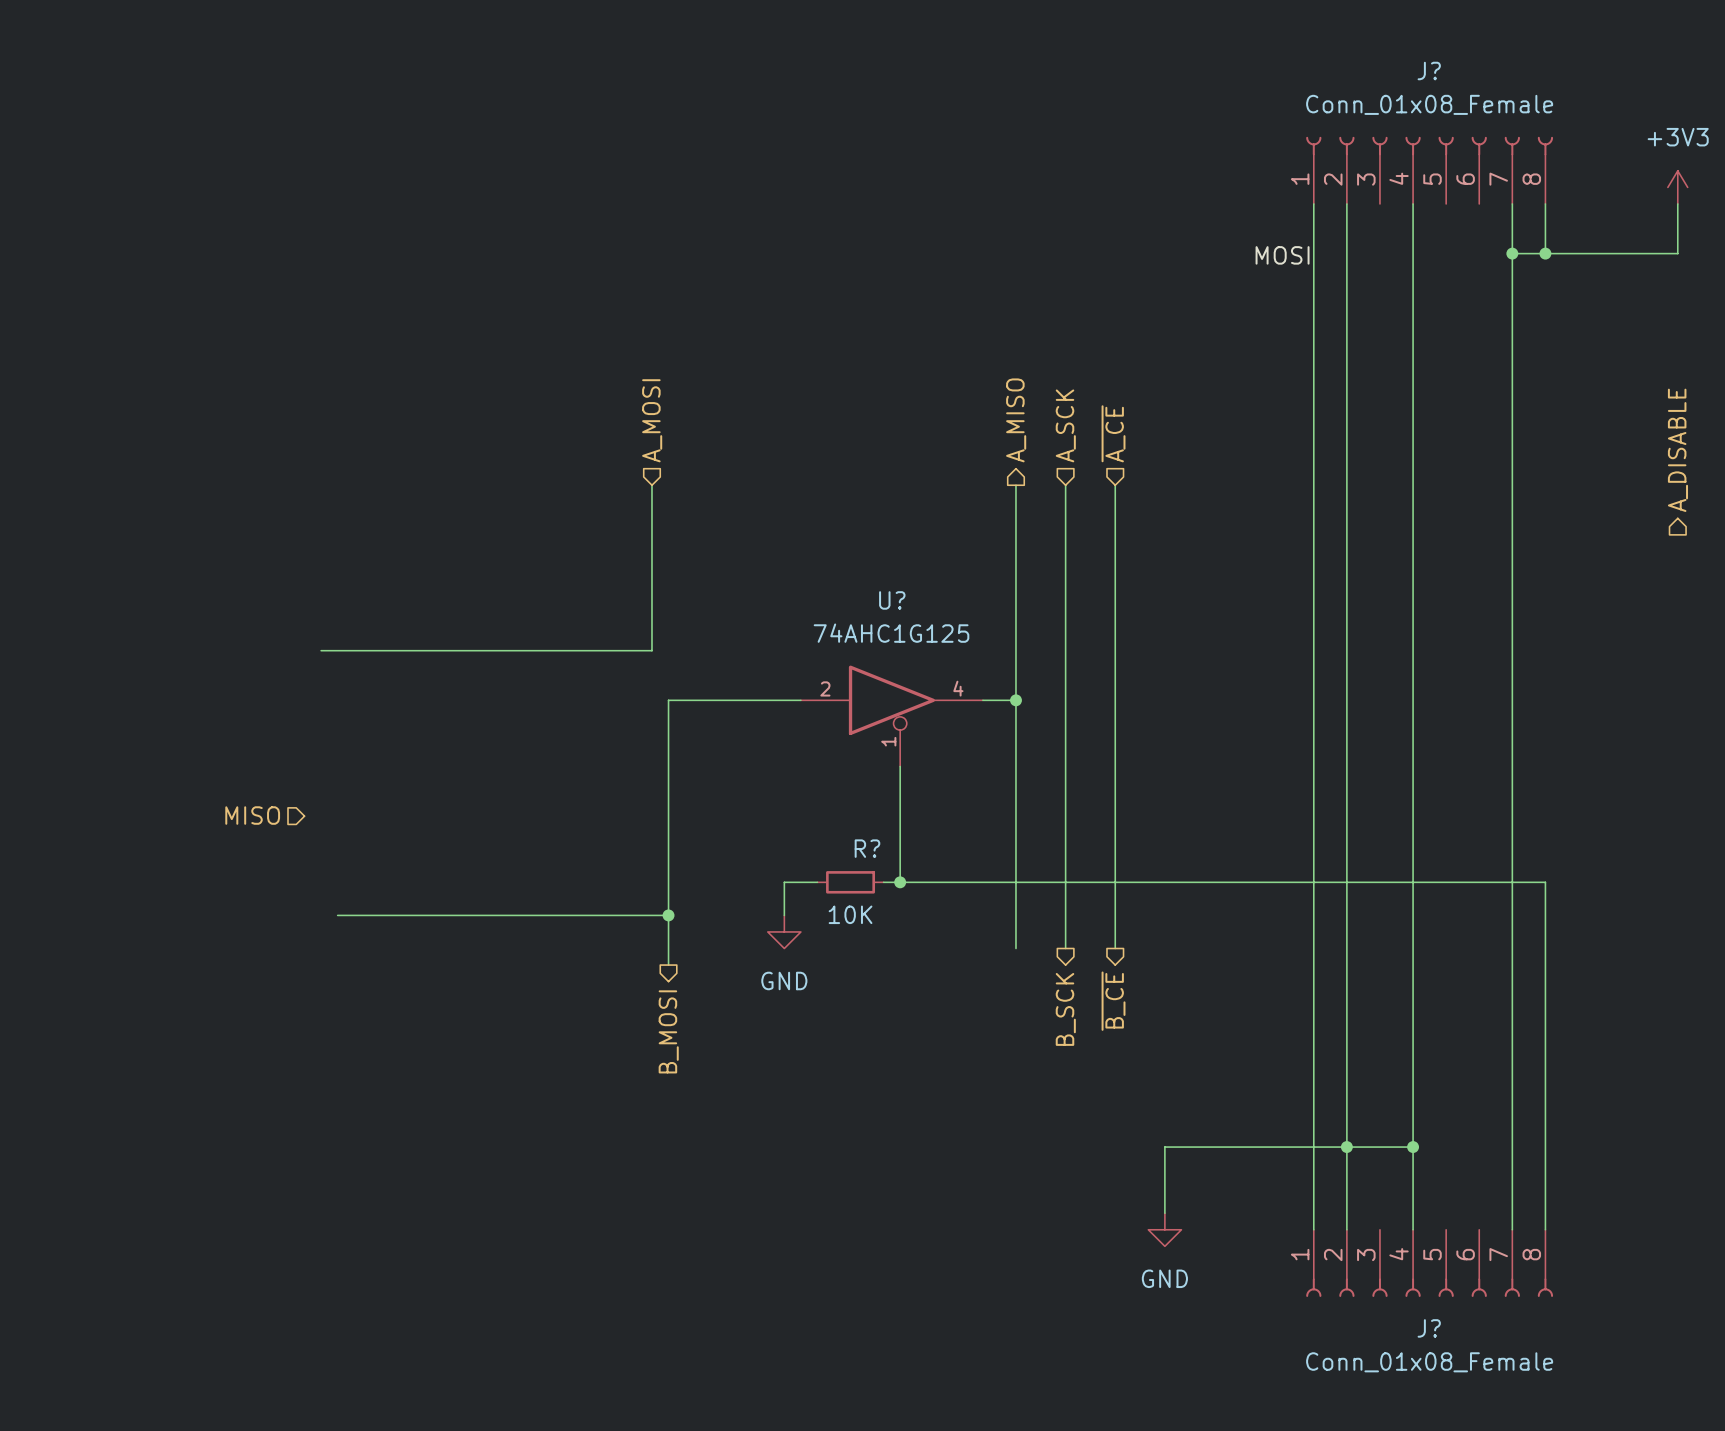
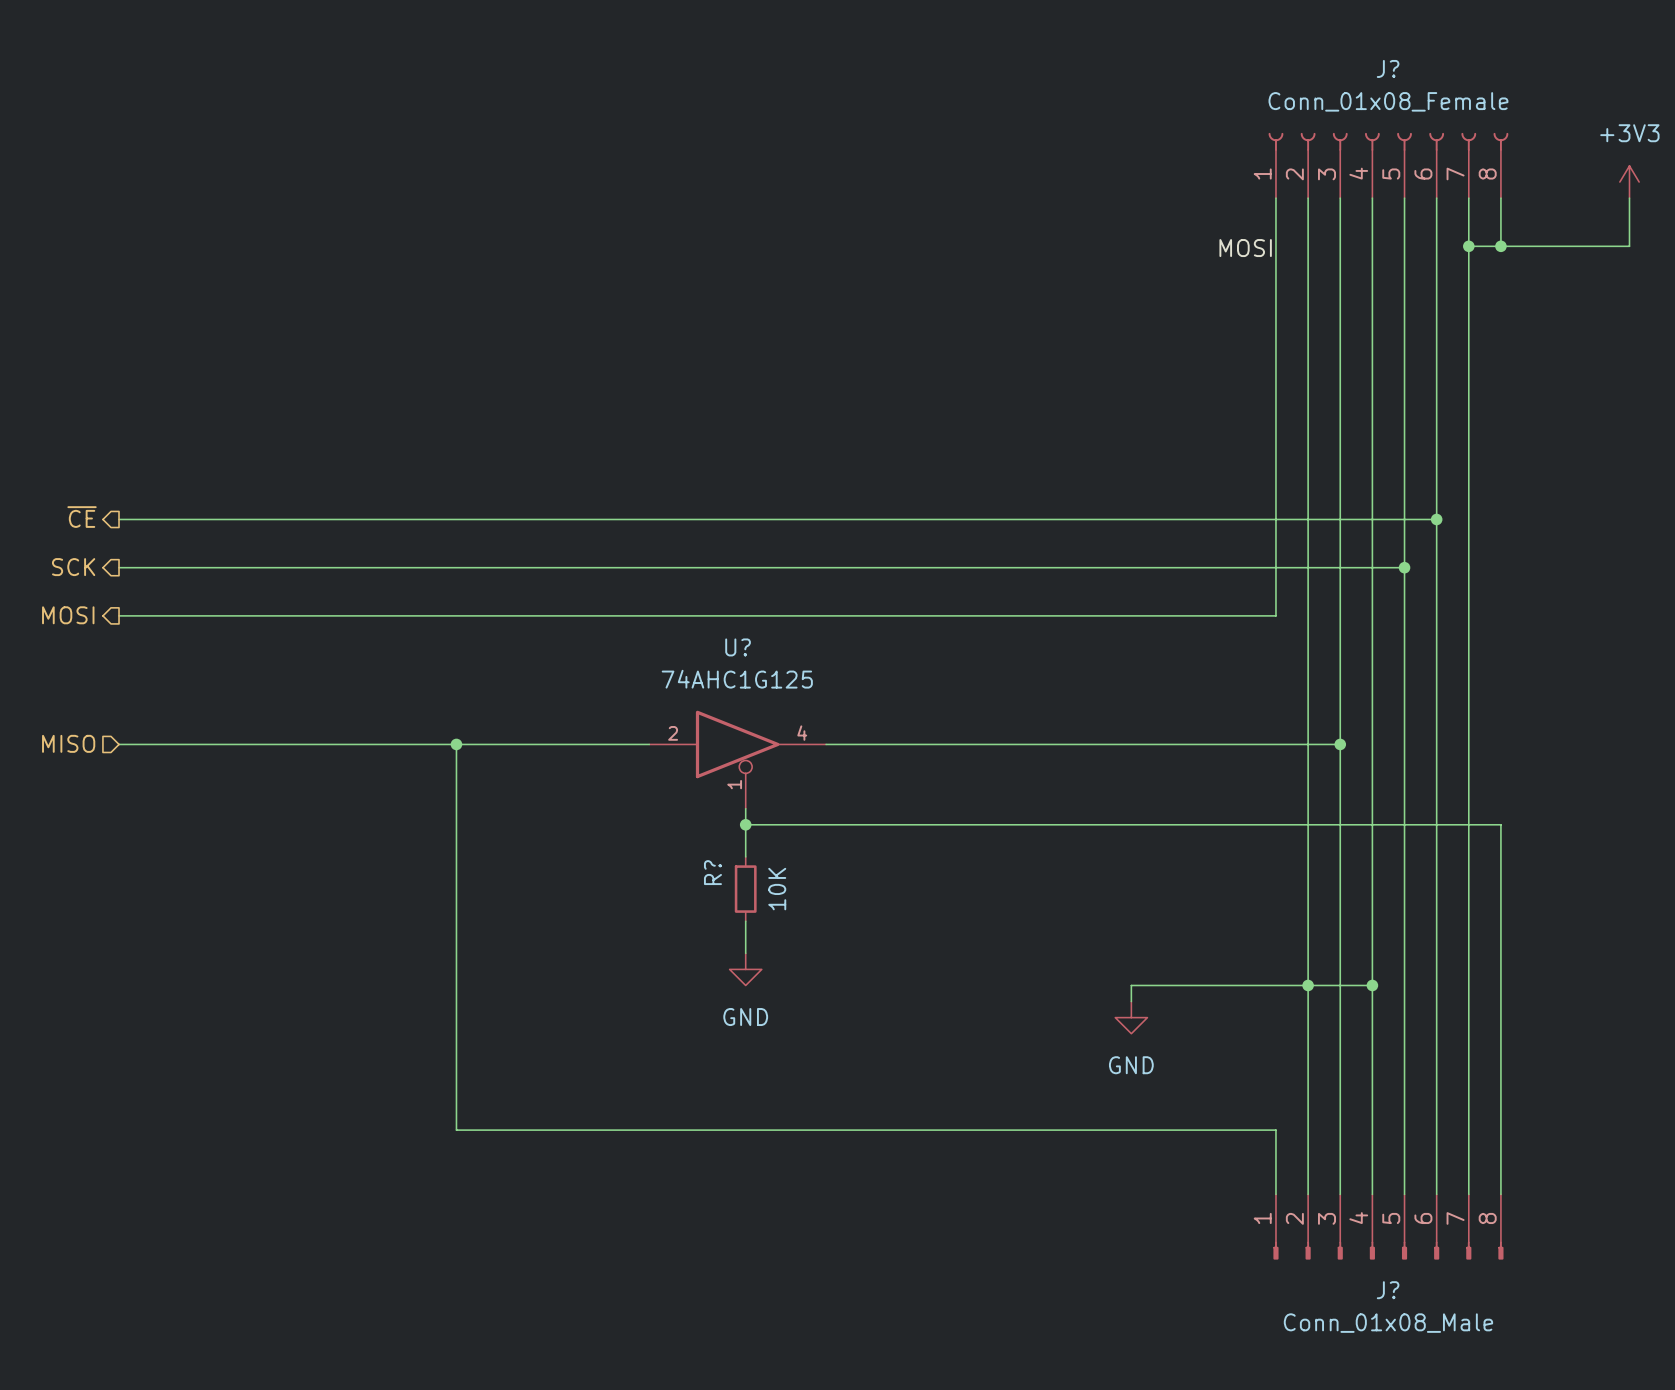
wire: none -> (1340, 198) (1340, 1194)
wire: none -> (1404, 198) (1404, 1194)
wire: none -> (1436, 198) (1436, 1194)
hierarchical label: A_MOSI (652, 420) -> none
hierarchical label: A_MISO (1016, 420) -> none
hierarchical label: A_SCK (1065, 425) -> none
hierarchical label: ~{A_CE} (1113, 433) -> none
hierarchical label: A_DISABLE (1677, 450) -> none
wire: (651, 485) (651, 650) (321, 650) -> none
wire: (1015, 485) (1015, 948) -> none
wire: (1065, 485) (1065, 948) -> none
wire: (1115, 485) (1115, 948) -> none
hierarchical label: none -> ~{CE} (82, 517)
wire: none -> (119, 519) (1436, 519)
junction: none -> (1436, 519)
hierarchical label: none -> SCK (73, 567)
wire: none -> (119, 567) (1404, 567)
junction: none -> (1404, 567)
hierarchical label: none -> MOSI (68, 615)
wire: none -> (119, 615) (1275, 615)
wire: (1313, 634) (1313, 1163) -> (456, 744) (456, 1130) (1275, 1130)
wire: (800, 700) (668, 700) (668, 965) -> none
wire: (982, 700) (1015, 700) -> none
junction: (1015, 700) -> none
U? position: (891, 716) -> (737, 759)
wire: none -> (119, 744) (649, 744)
junction: none -> (456, 744)
wire: none -> (826, 744) (1340, 744)
wire: (900, 766) (900, 882) -> none
junction: none -> (1340, 744)
hierarchical label position: MISO (252, 815) -> MISO (68, 743)
wire: none -> (745, 808) (745, 856)
R? name position: R? (867, 848) -> R? (712, 872)
junction: none -> (745, 824)
wire: (817, 882) (784, 882) (784, 915) -> none
R? rotation: 0° (850, 882) -> 90° clockwise (745, 889)
R? position: (850, 882) -> (745, 889)
wire: (883, 882) (1545, 882) -> (745, 824) (1500, 824) (1500, 856)
junction: (900, 882) -> none
R? value position: 10K (850, 914) -> 10K (777, 889)
wire: (337, 915) (668, 915) -> none
junction: (668, 915) -> none
power symbol position: GND (784, 931) -> GND (745, 969)
wire: none -> (745, 921) (745, 953)
hierarchical label: ~{B_CE} (1113, 1001) -> none
hierarchical label: B_SCK (1065, 1009) -> none
junction: none -> (1308, 985)
wire: none -> (1372, 985) (1131, 985) (1131, 1001)
junction: none -> (1372, 985)
hierarchical label: B_MOSI (668, 1031) -> none
junction: (1346, 1147) -> none
wire: (1413, 1147) (1164, 1147) (1164, 1213) -> none
junction: (1413, 1147) -> none
power symbol position: GND (1164, 1229) -> GND (1131, 1017)
J? symbol: [1306, 1229, 1554, 1297] -> [1273, 1194, 1504, 1260]
J? value: Conn_01x08_Female (1429, 1362) -> Conn_01x08_Male (1388, 1323)

